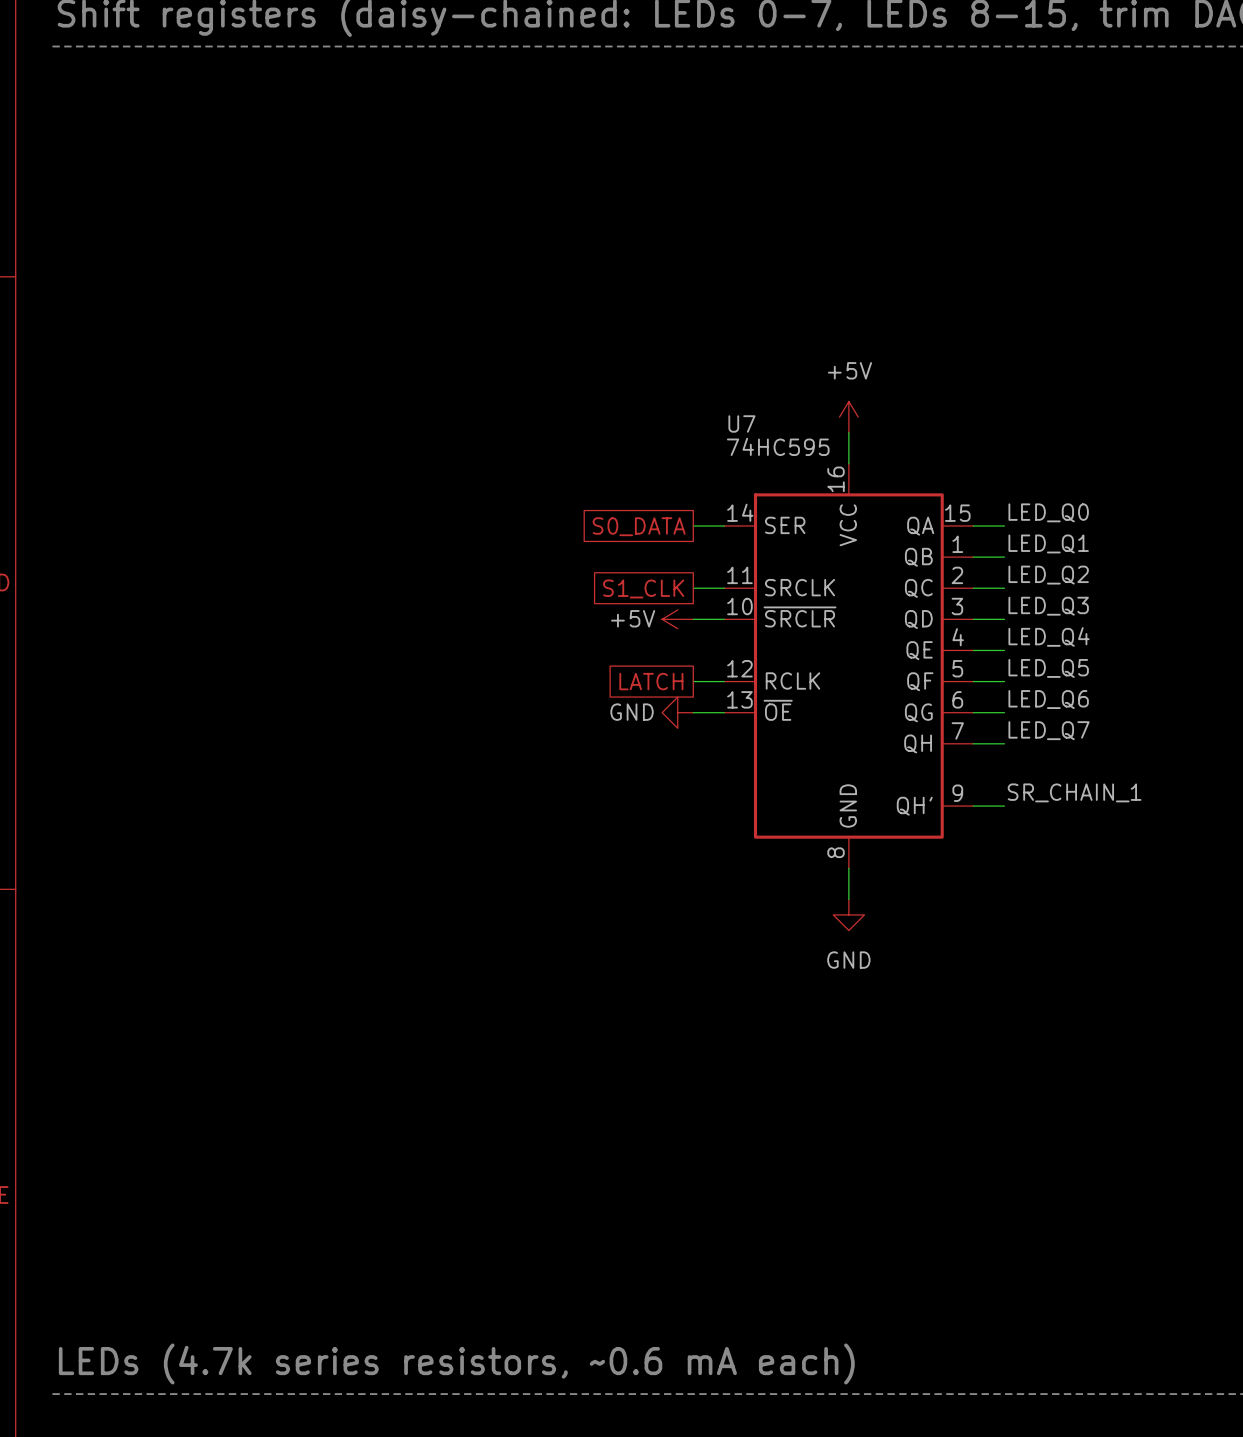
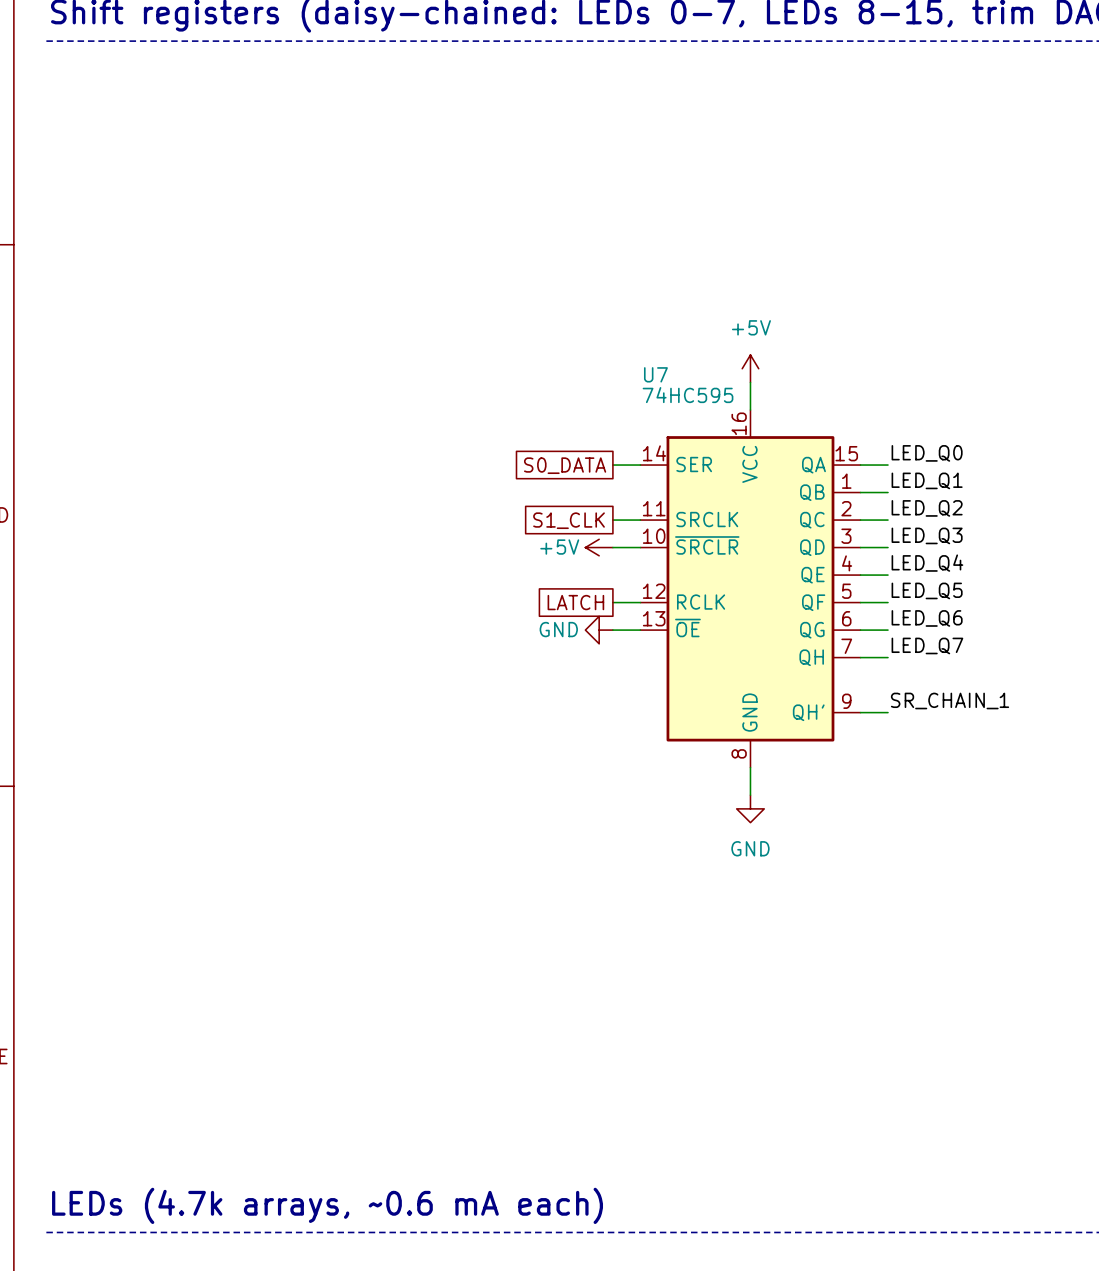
text: LEDs (4.7k series resistors, ~0.6 mA each) (456, 1363) -> LEDs (4.7k arrays, ~0.6 mA each) (327, 1205)

